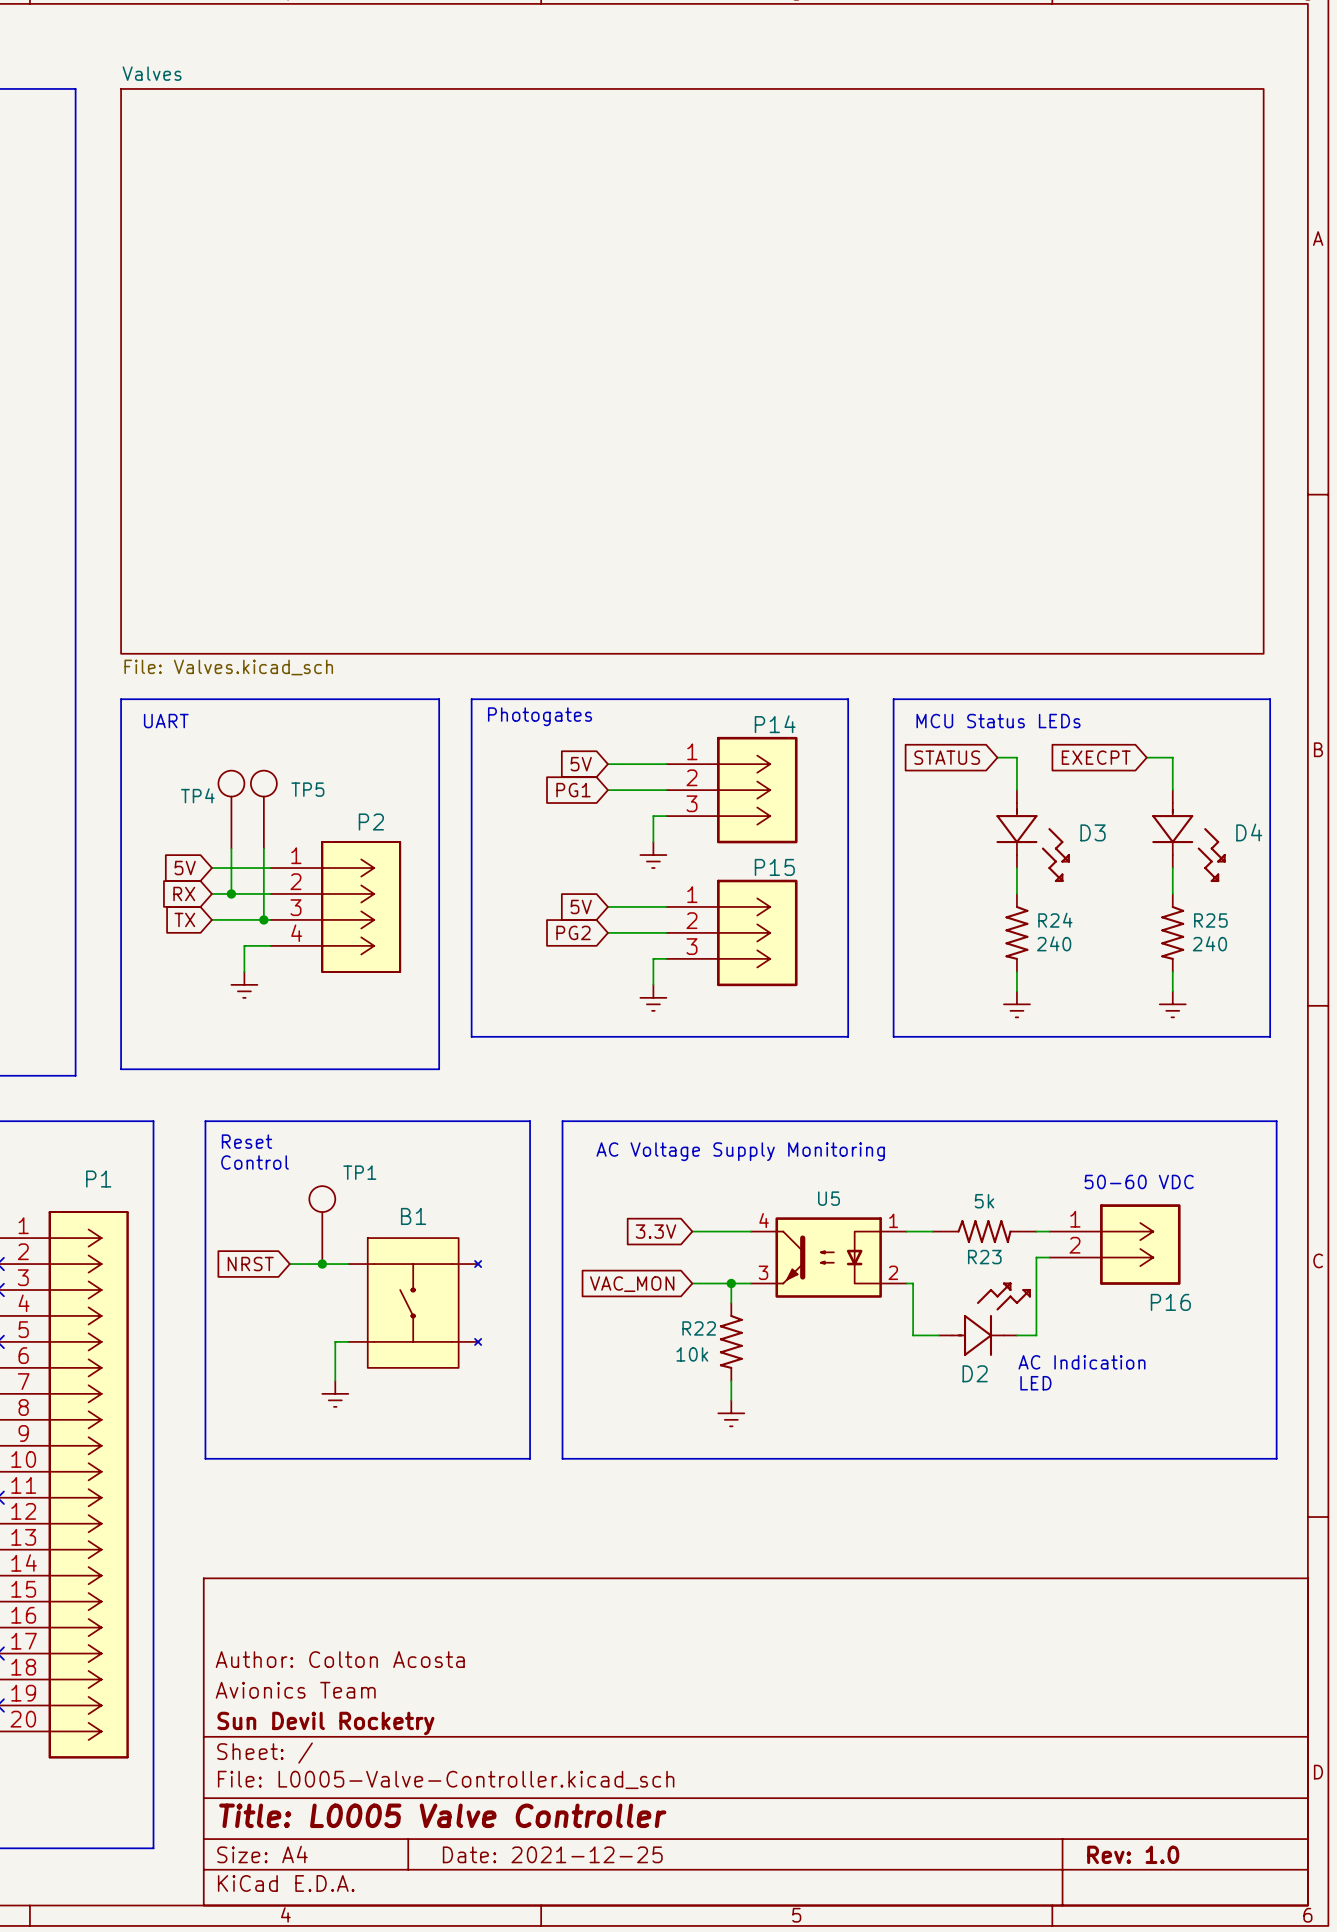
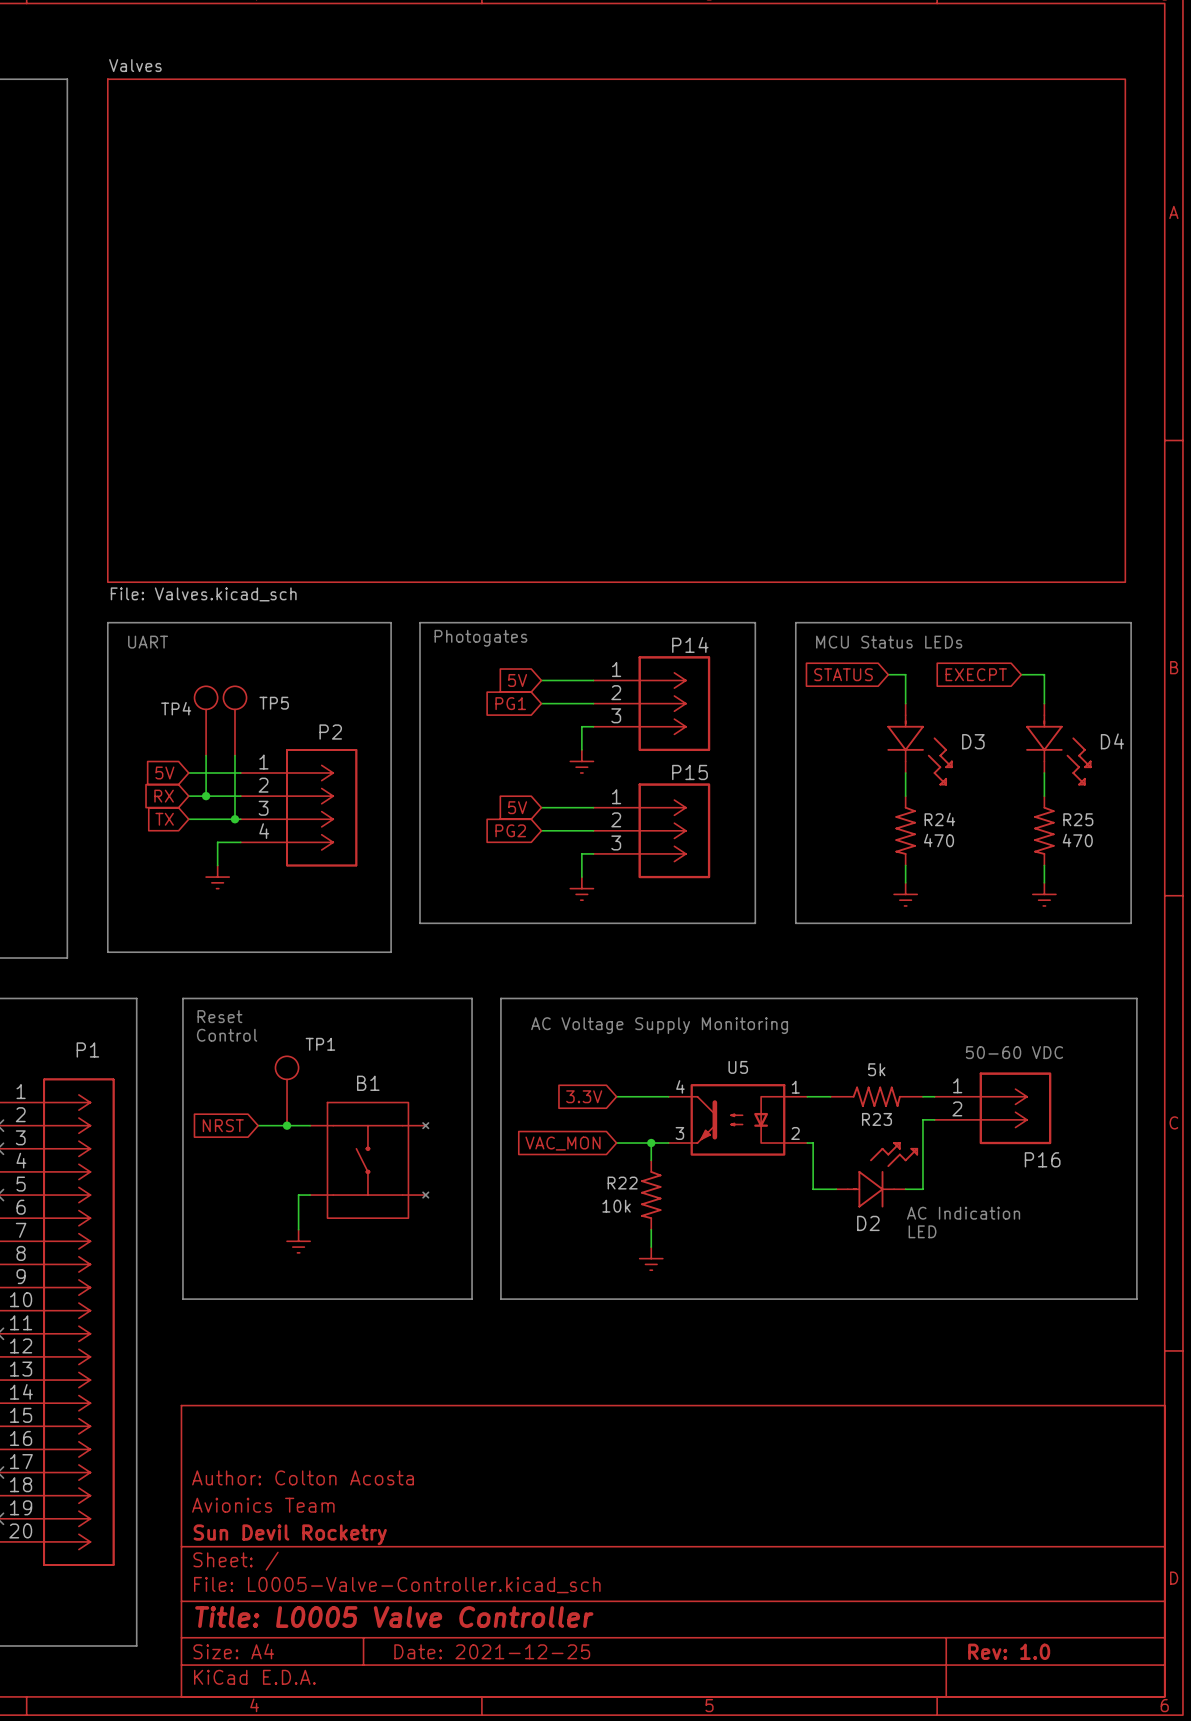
R24 value: 240 (1054, 943) -> 470 (939, 840)
R25 value: 240 (1209, 943) -> 470 (1077, 840)

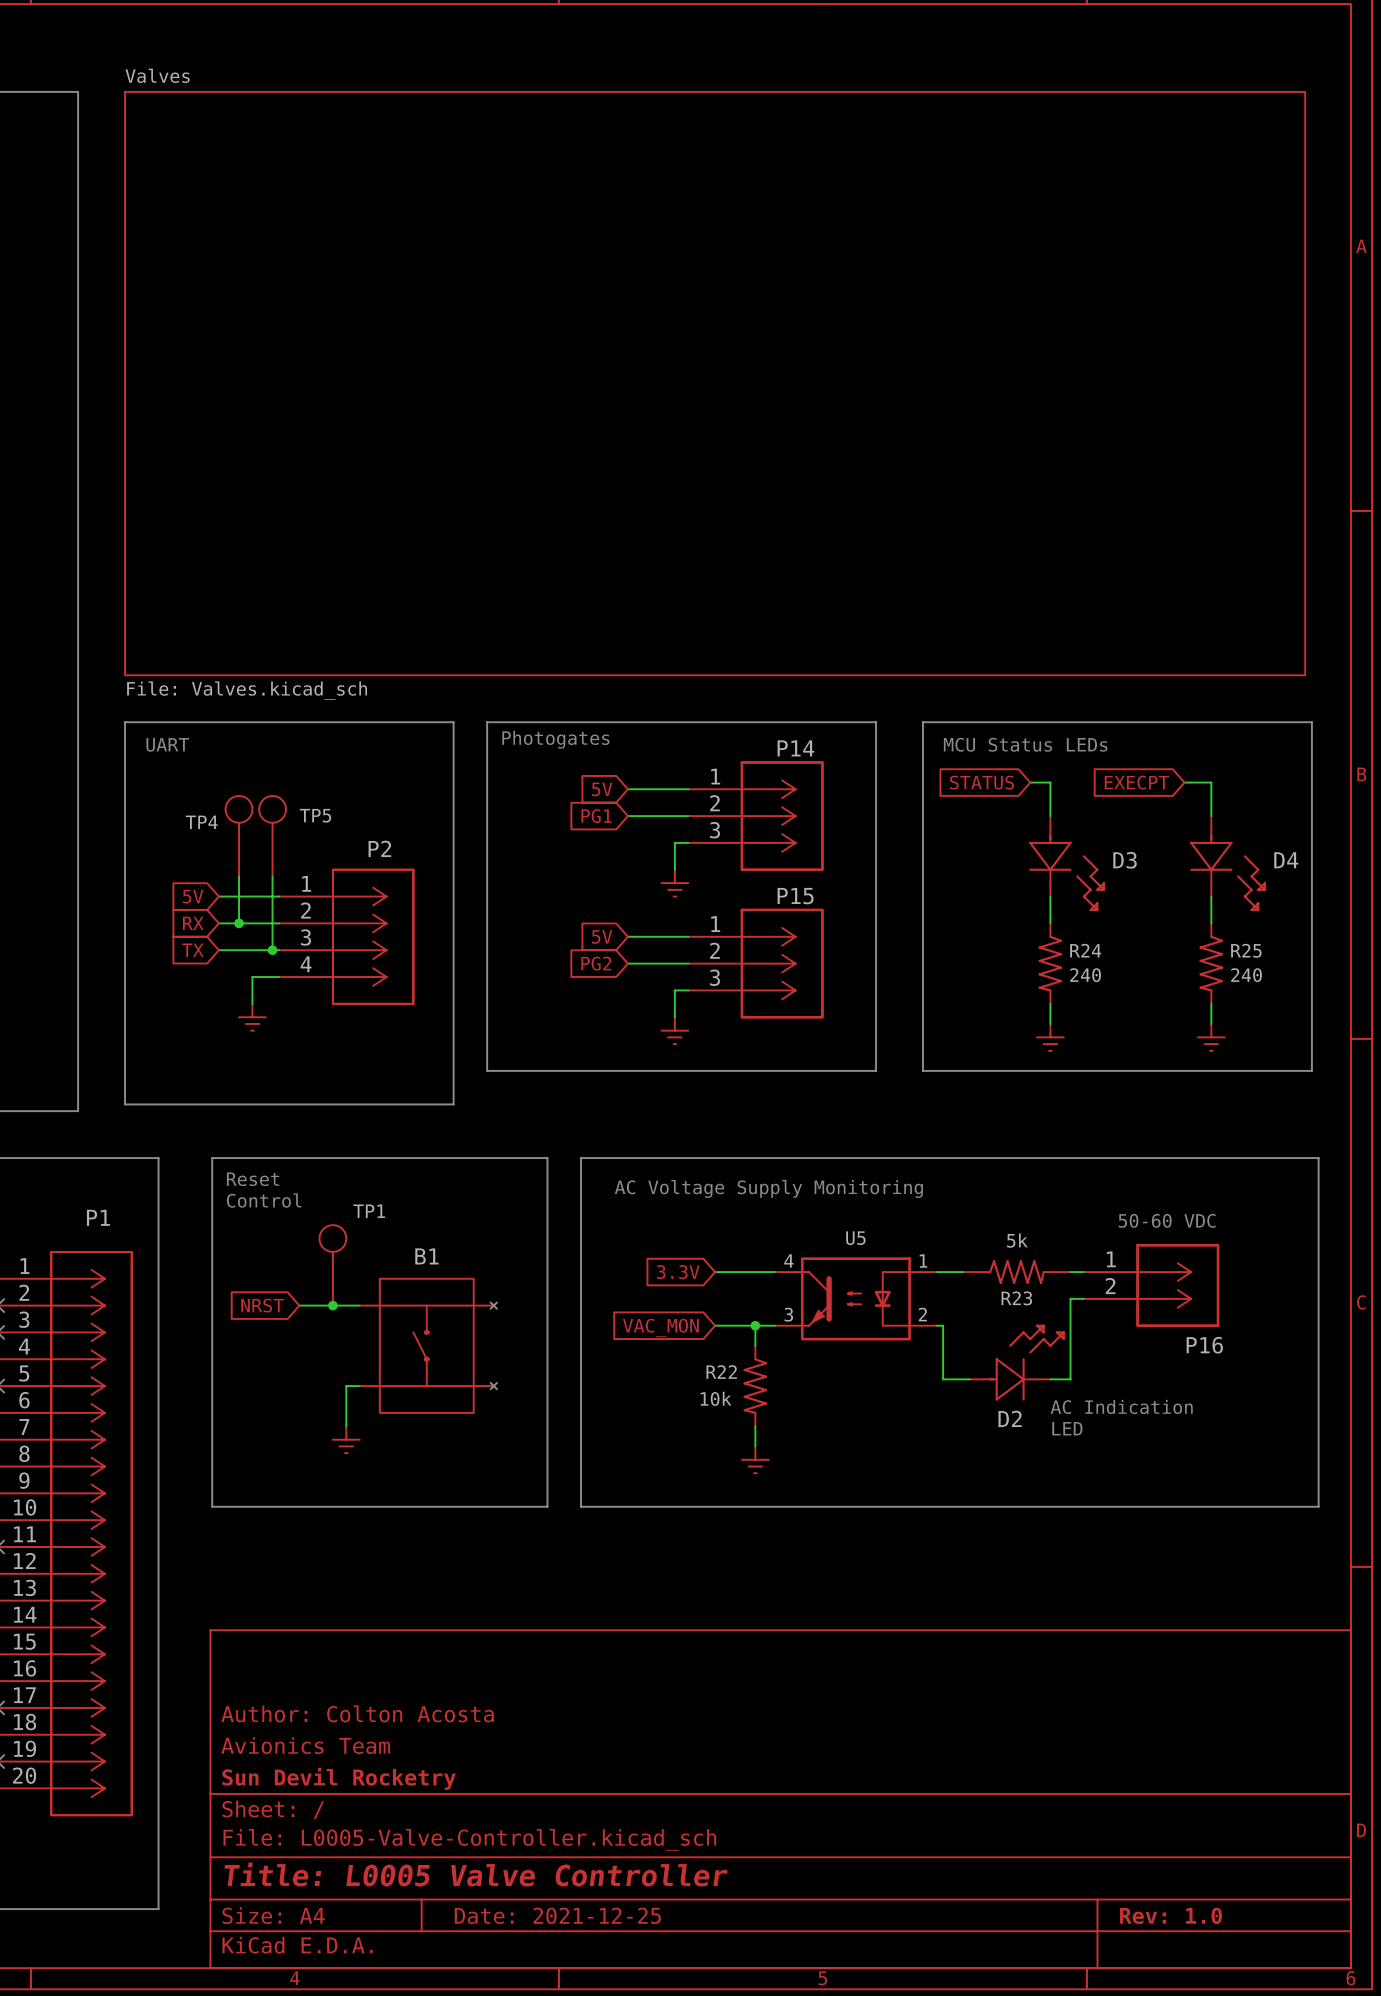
R24 value: 470 (939, 840) -> 240 (1085, 975)
R25 value: 470 (1077, 840) -> 240 (1246, 975)

